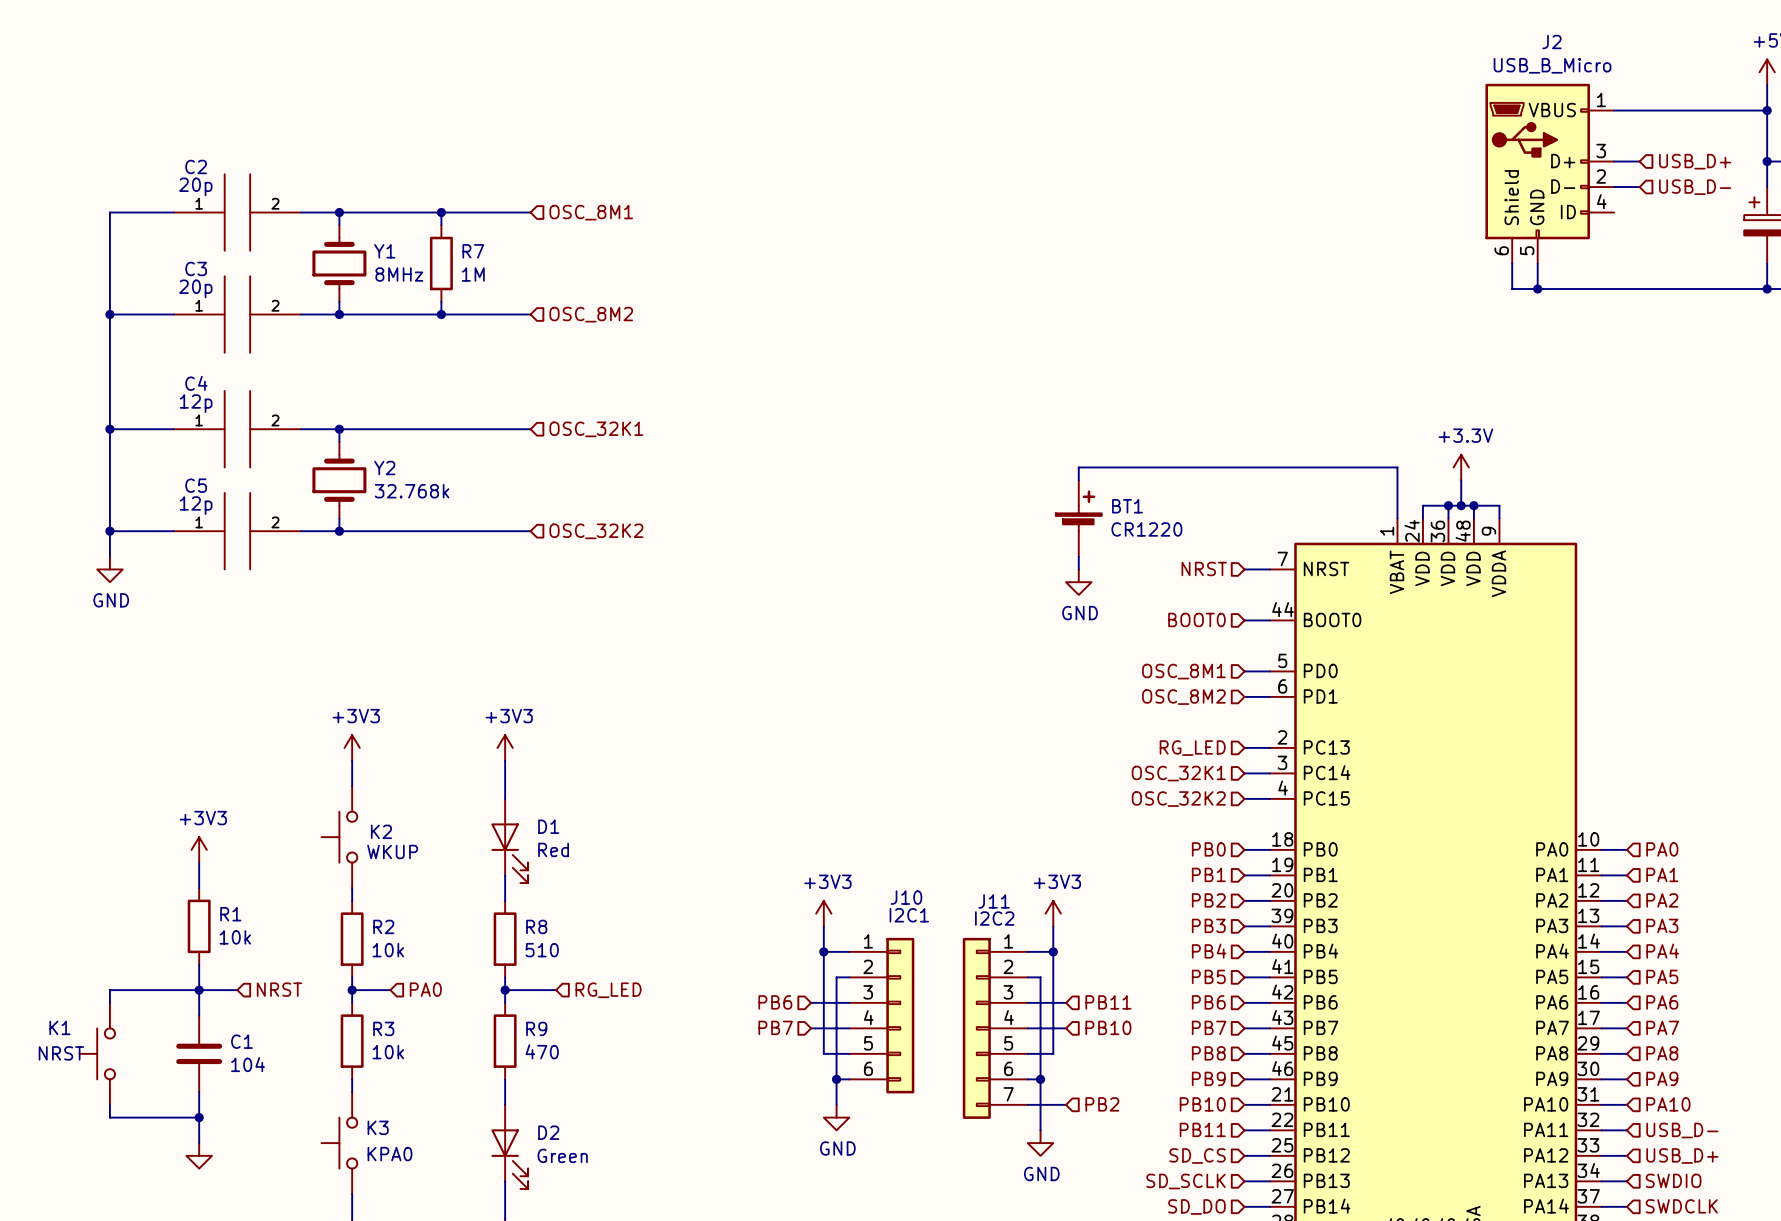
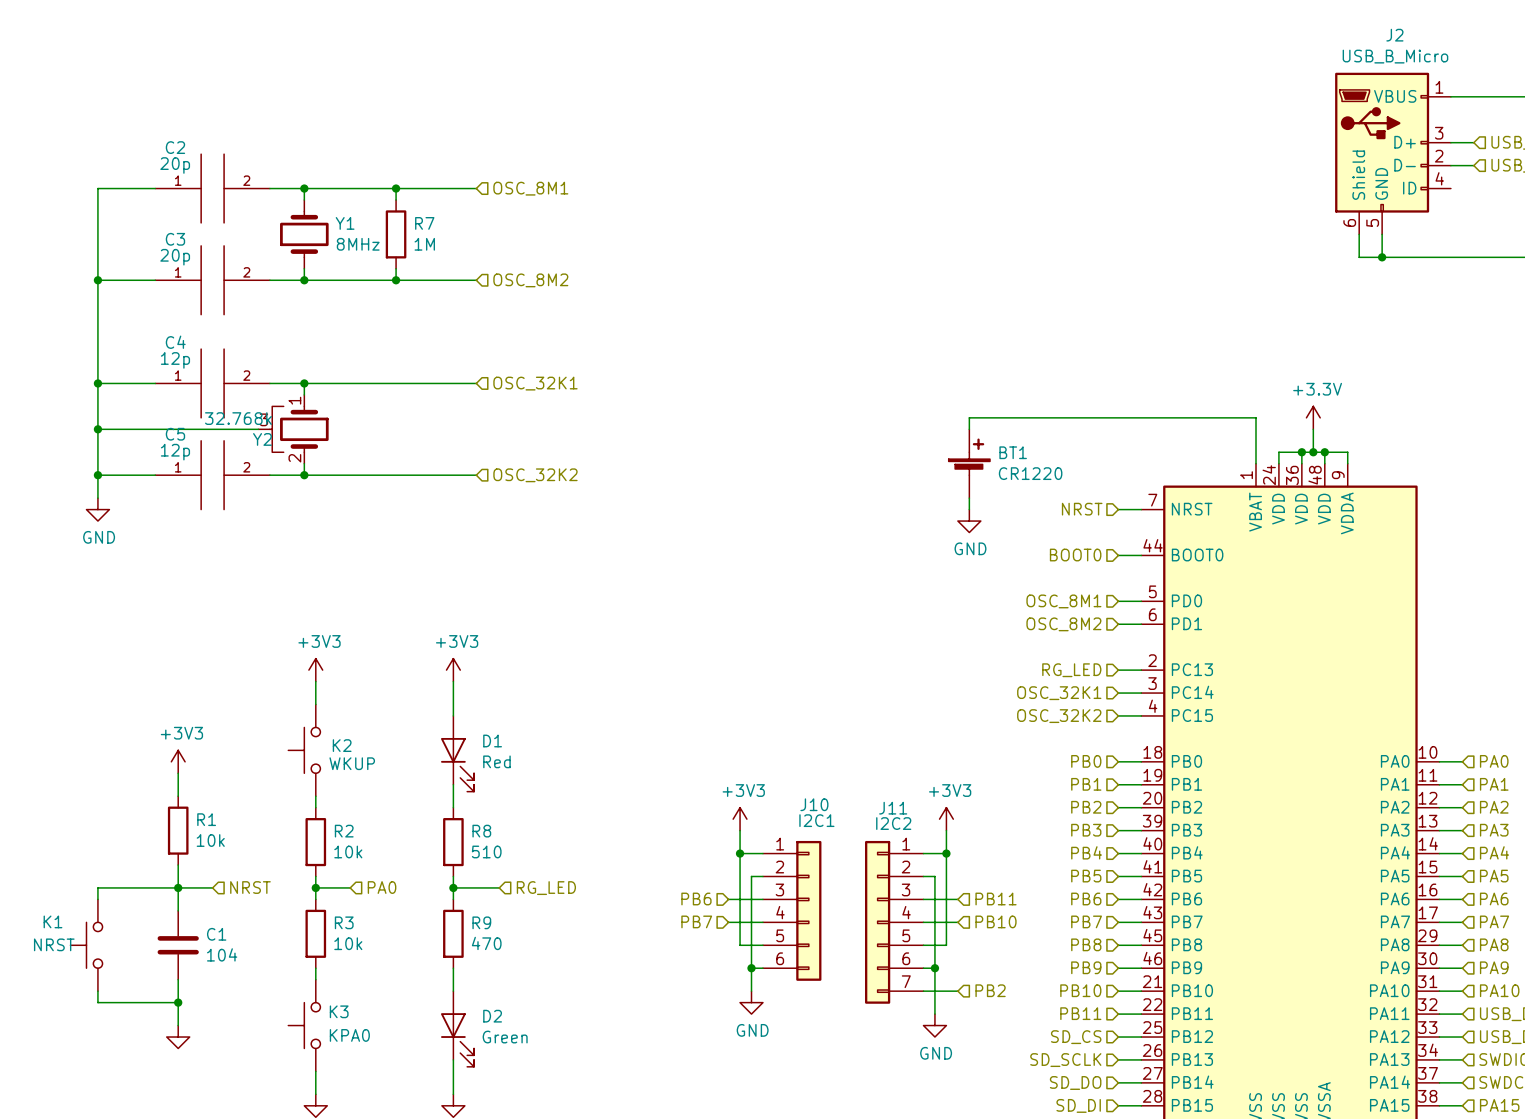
Y2 symbol: [312, 441, 367, 519] -> [258, 394, 329, 464]
Y2 name position: Y2 (384, 468) -> Y2 (262, 439)
wire: none -> (97, 429) (258, 429)
junction: none -> (97, 429)
Y2 value position: 32.768k (412, 491) -> 32.768k (238, 418)

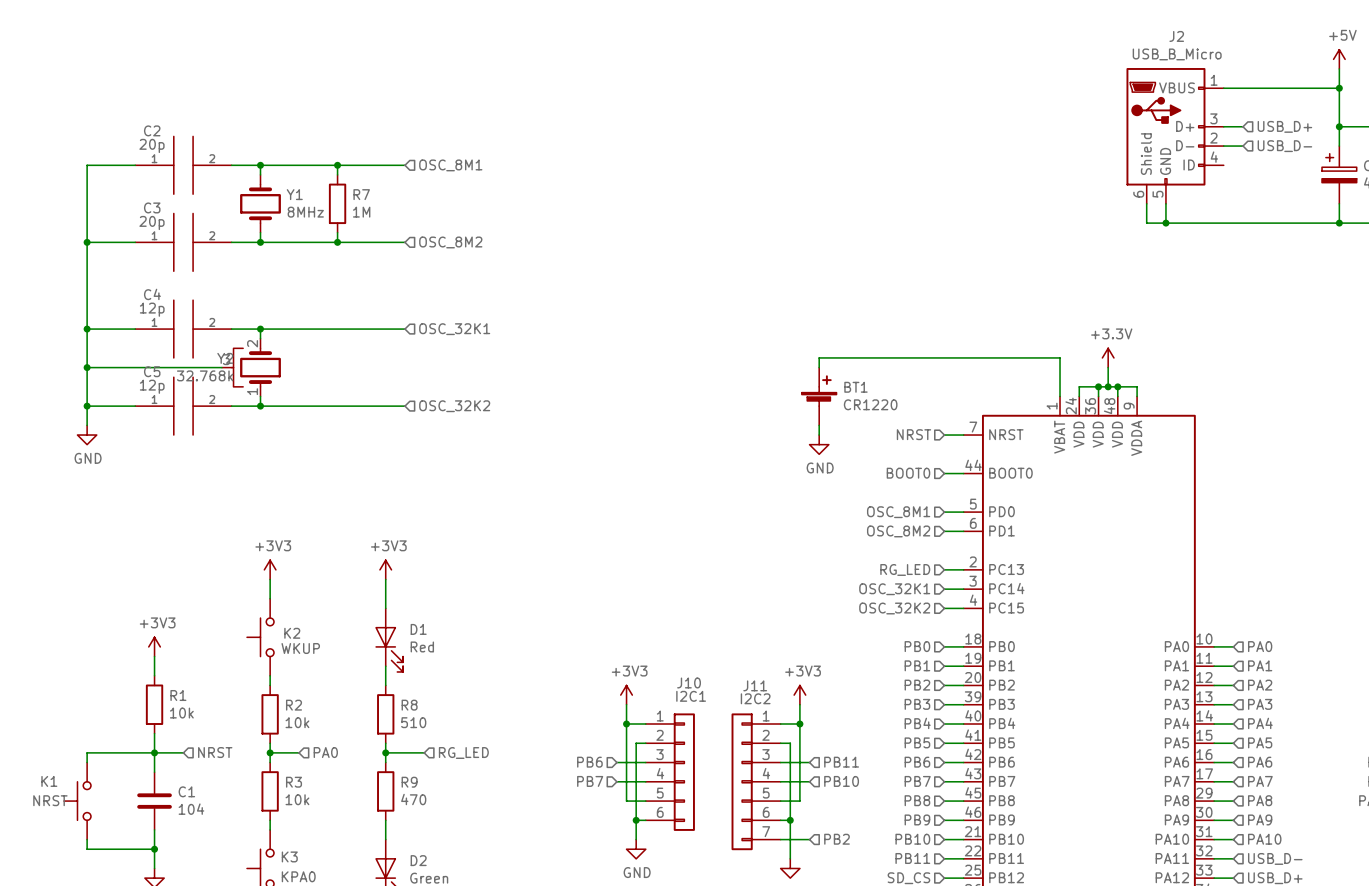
Y2 flip: as is (299, 429) -> up-down (256, 367)

